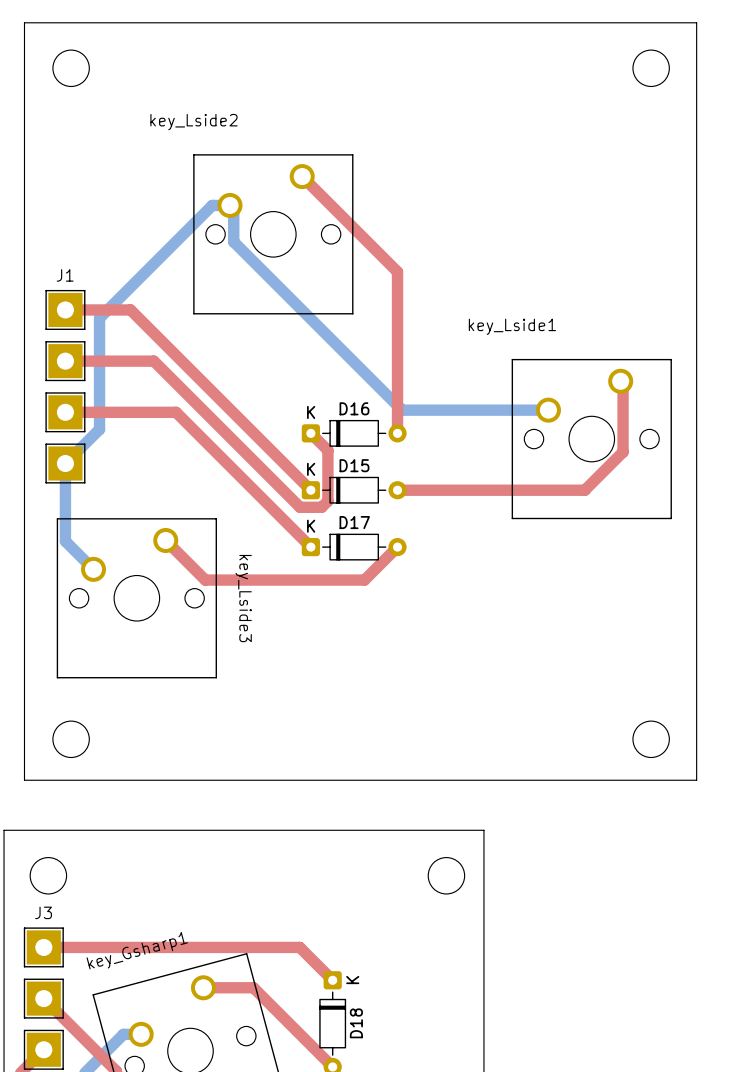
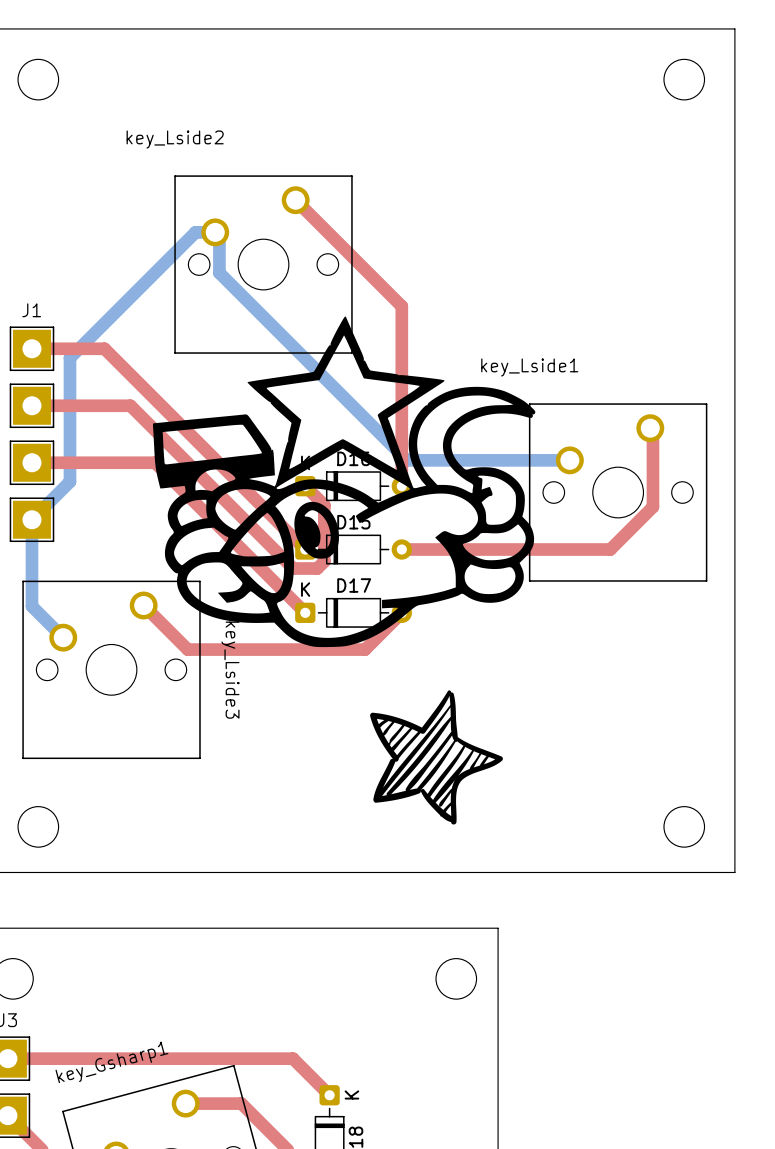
drawing: none -> [152, 316, 536, 648]
drawing: none -> [370, 690, 503, 825]

